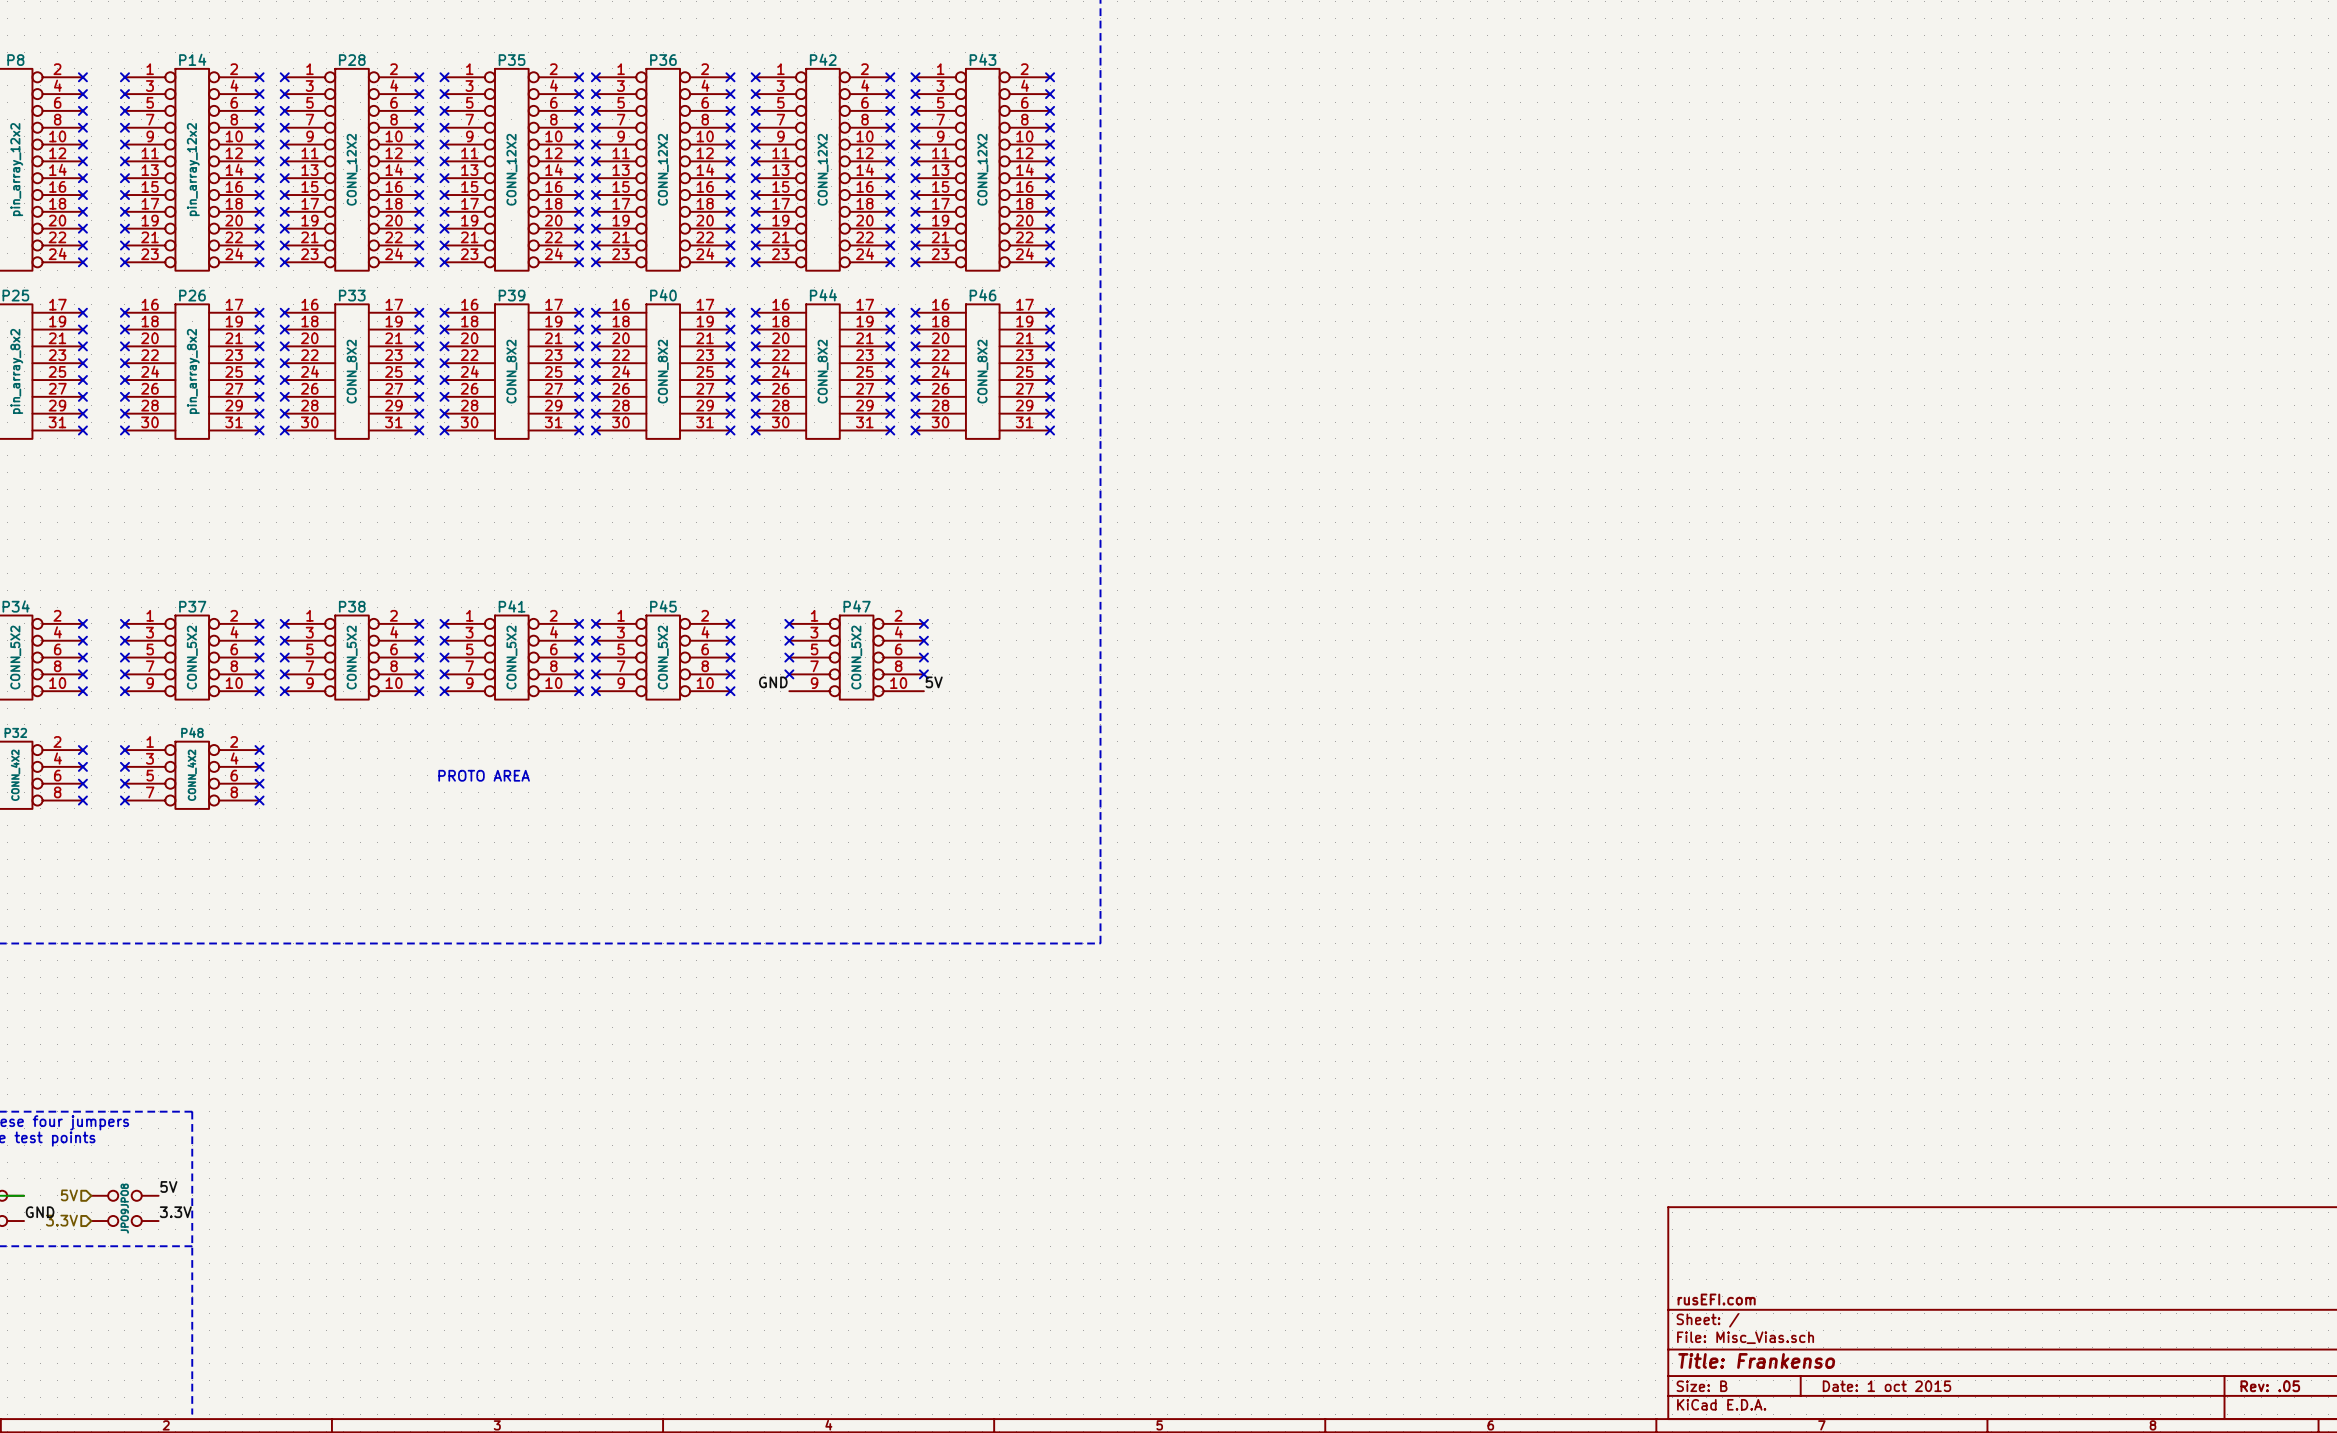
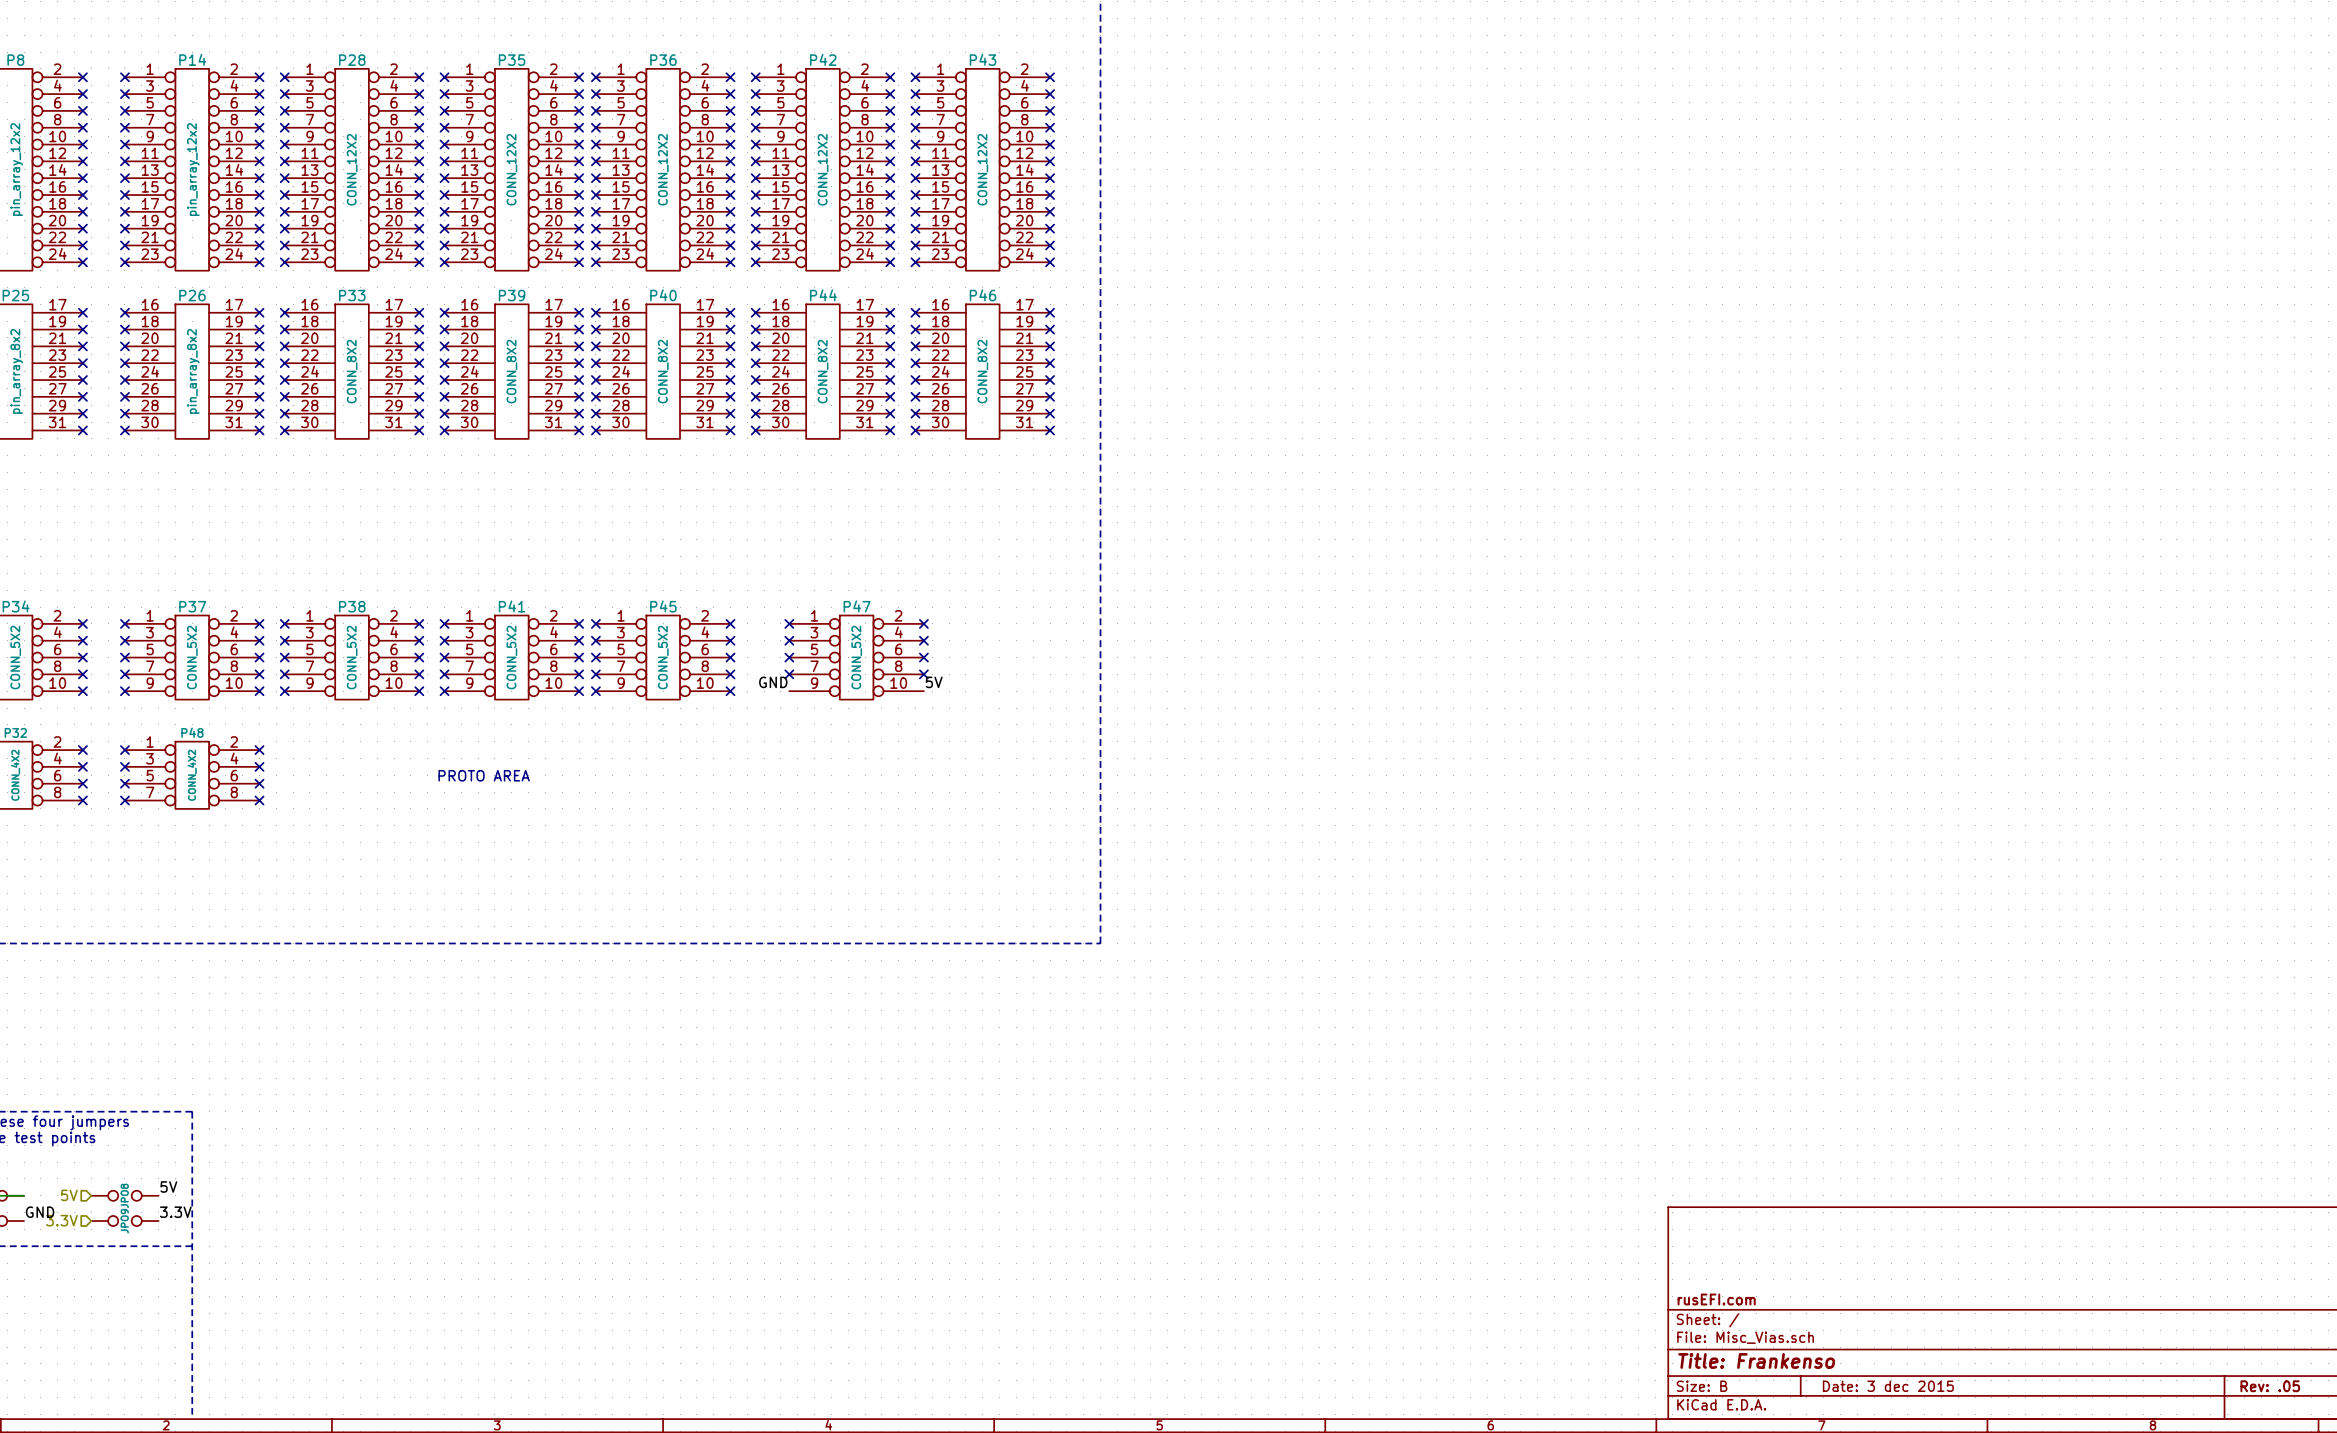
title block: Date: 1 oct 2015 (1886, 1386) -> Date: 3 dec 2015 (1888, 1386)

